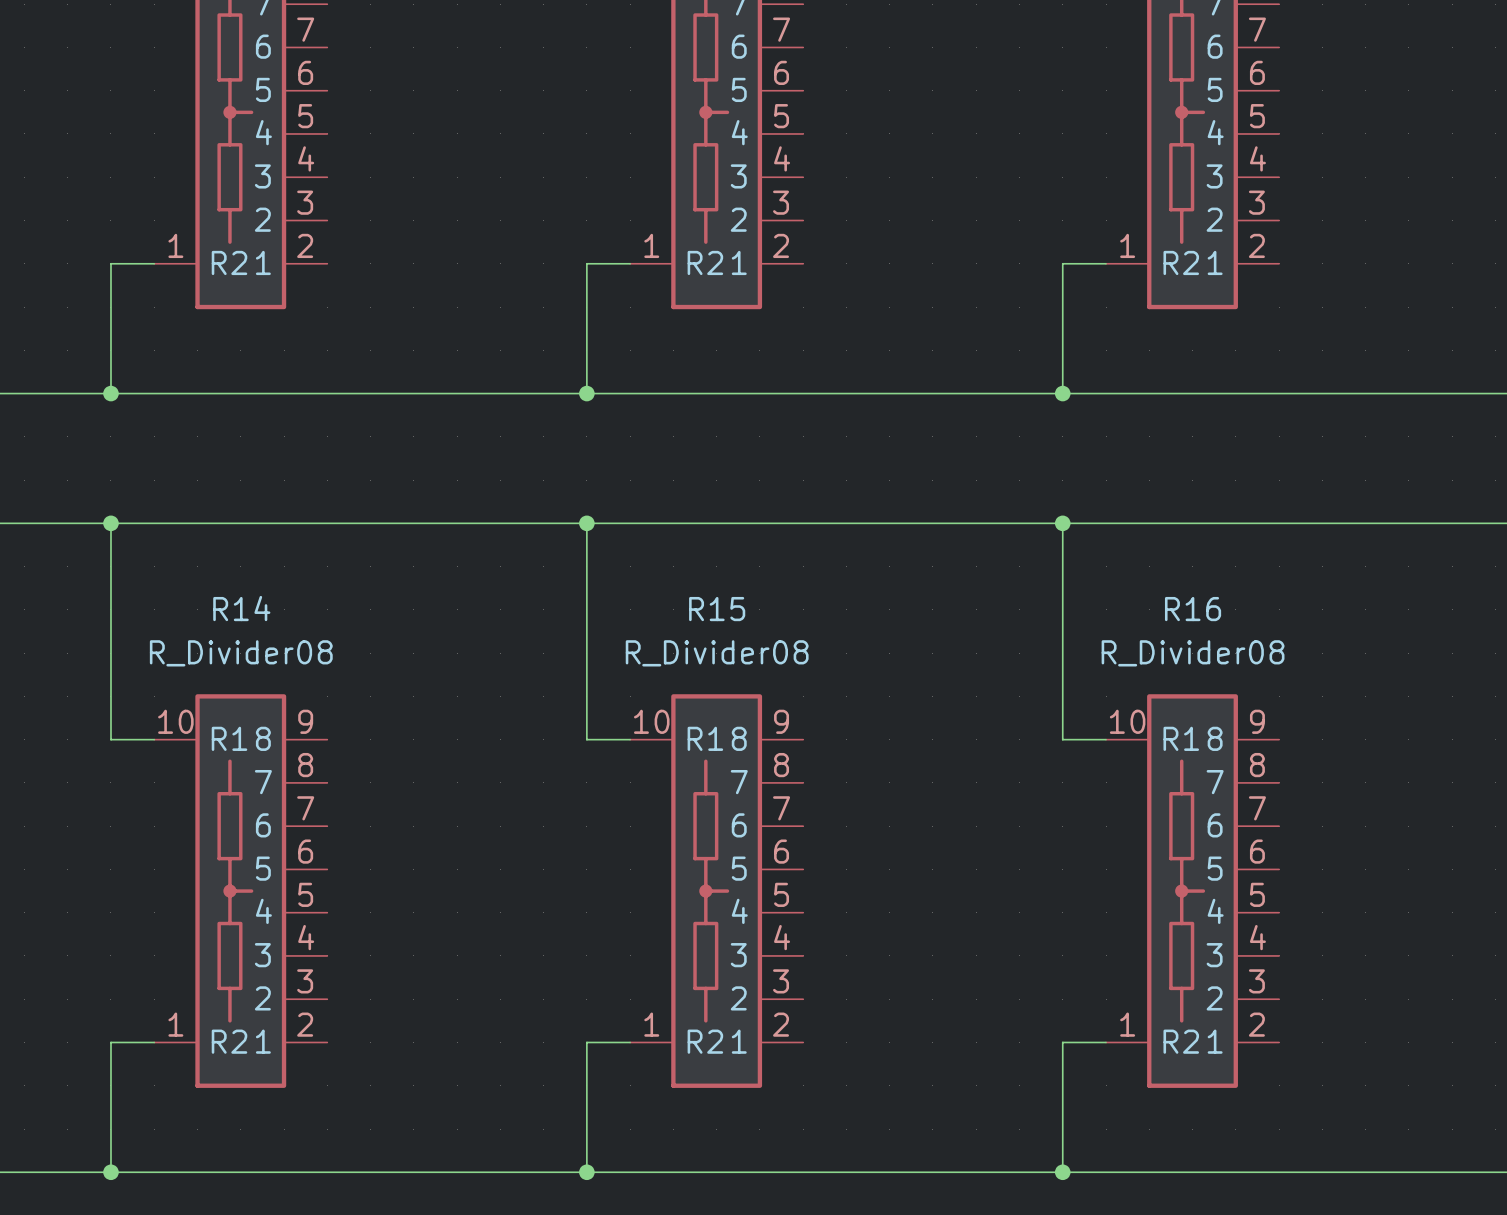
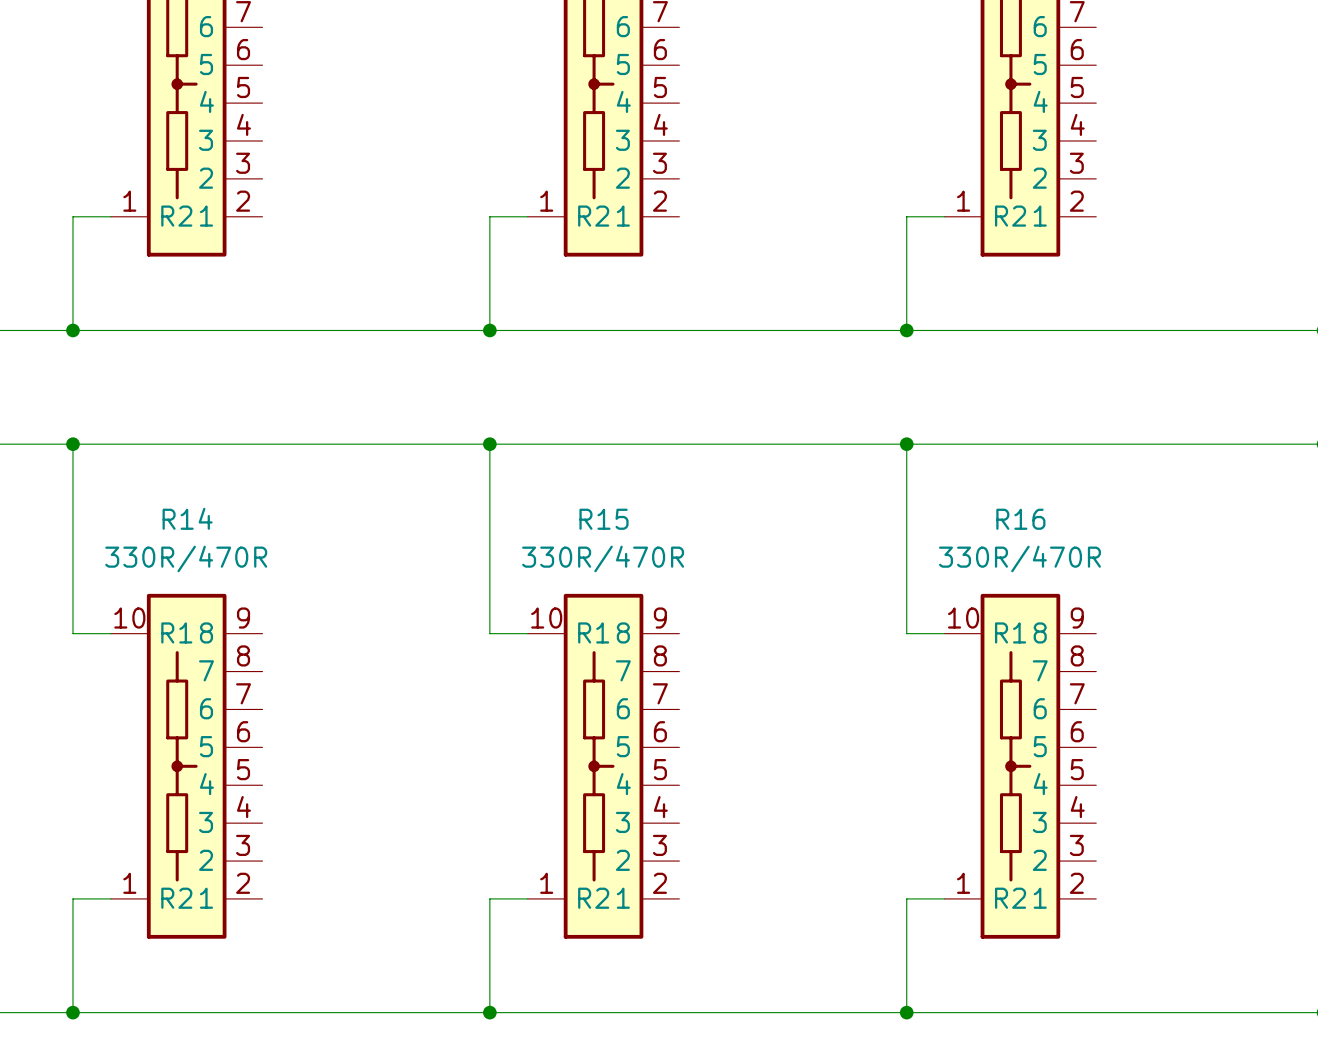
R14 value: R_Divider08 (241, 653) -> 330R/470R (186, 558)
R15 value: R_Divider08 (717, 653) -> 330R/470R (603, 558)
R16 value: R_Divider08 (1193, 653) -> 330R/470R (1019, 558)

